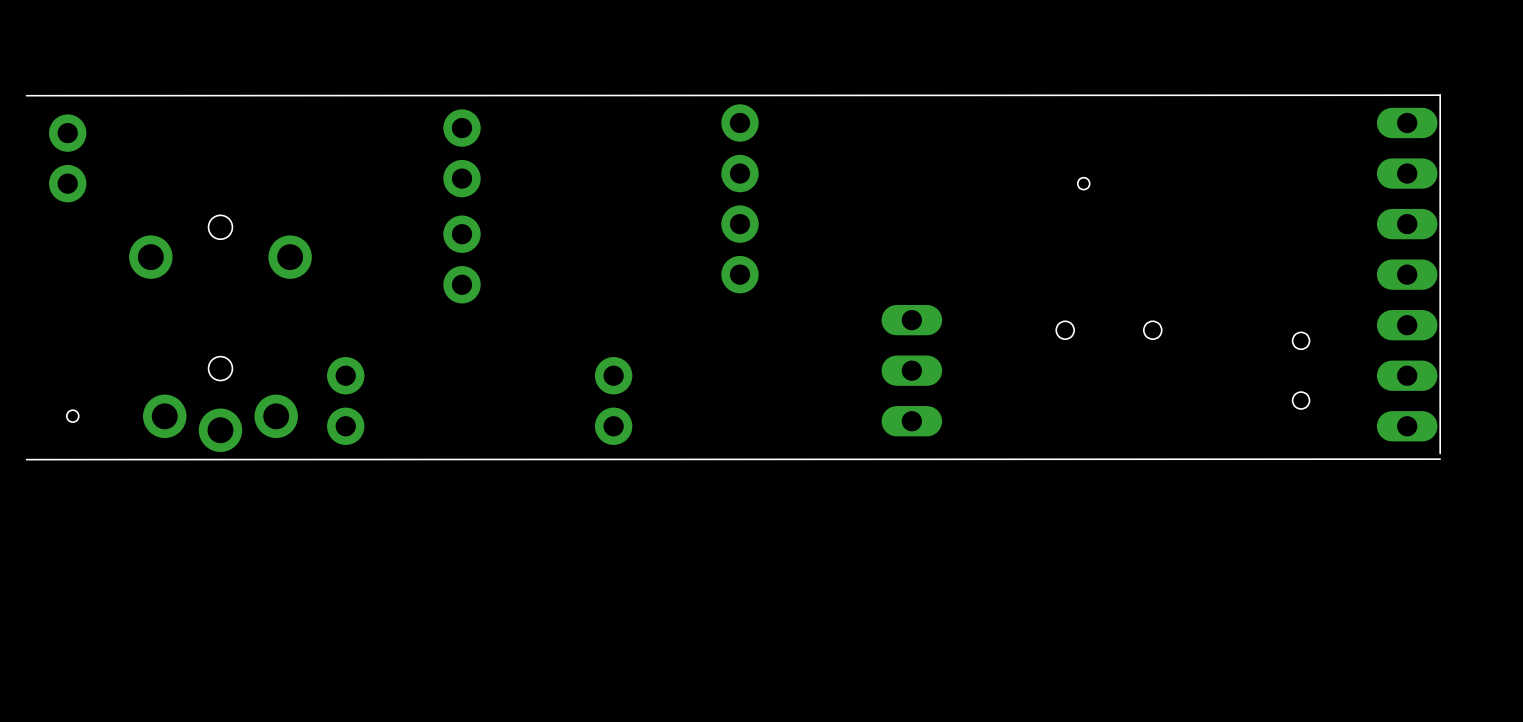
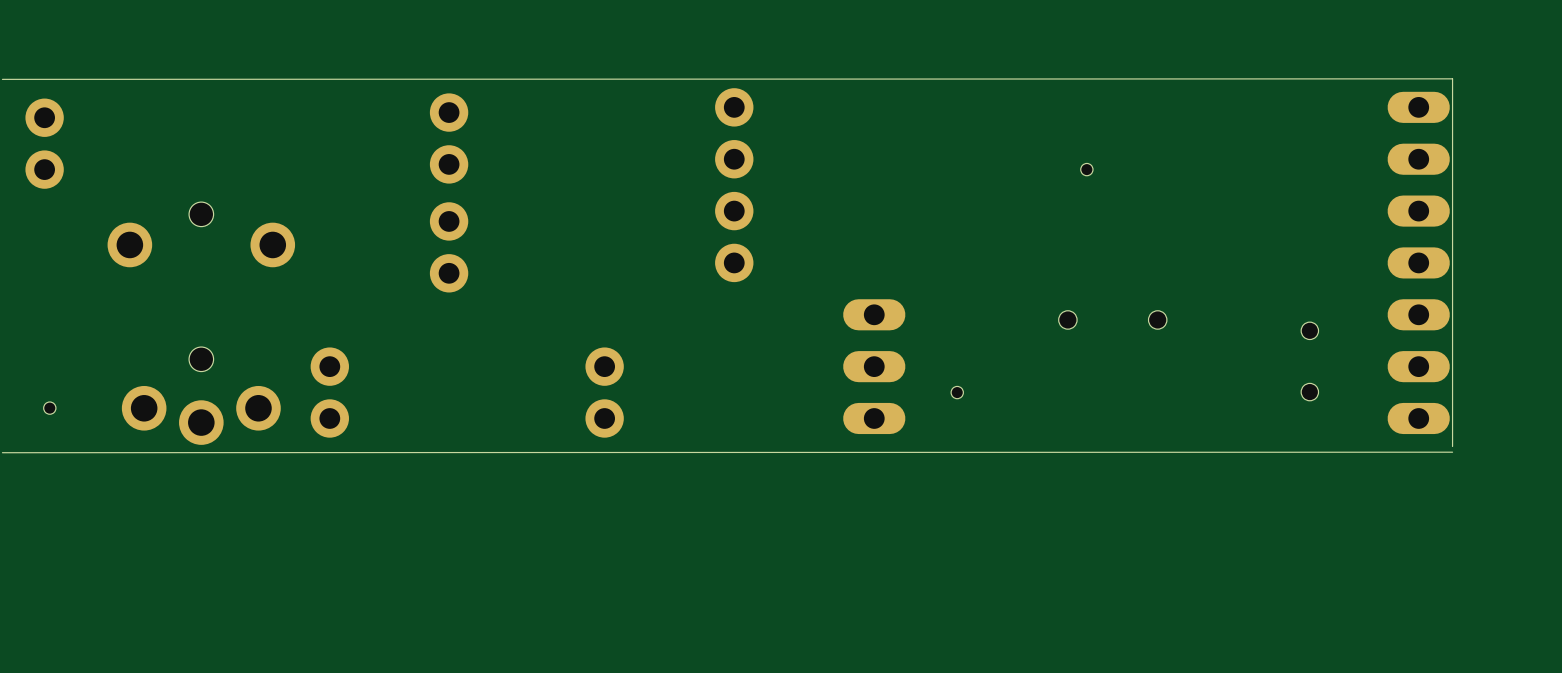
part position: (911, 370) -> (874, 366)
hole: none -> (957, 392)

